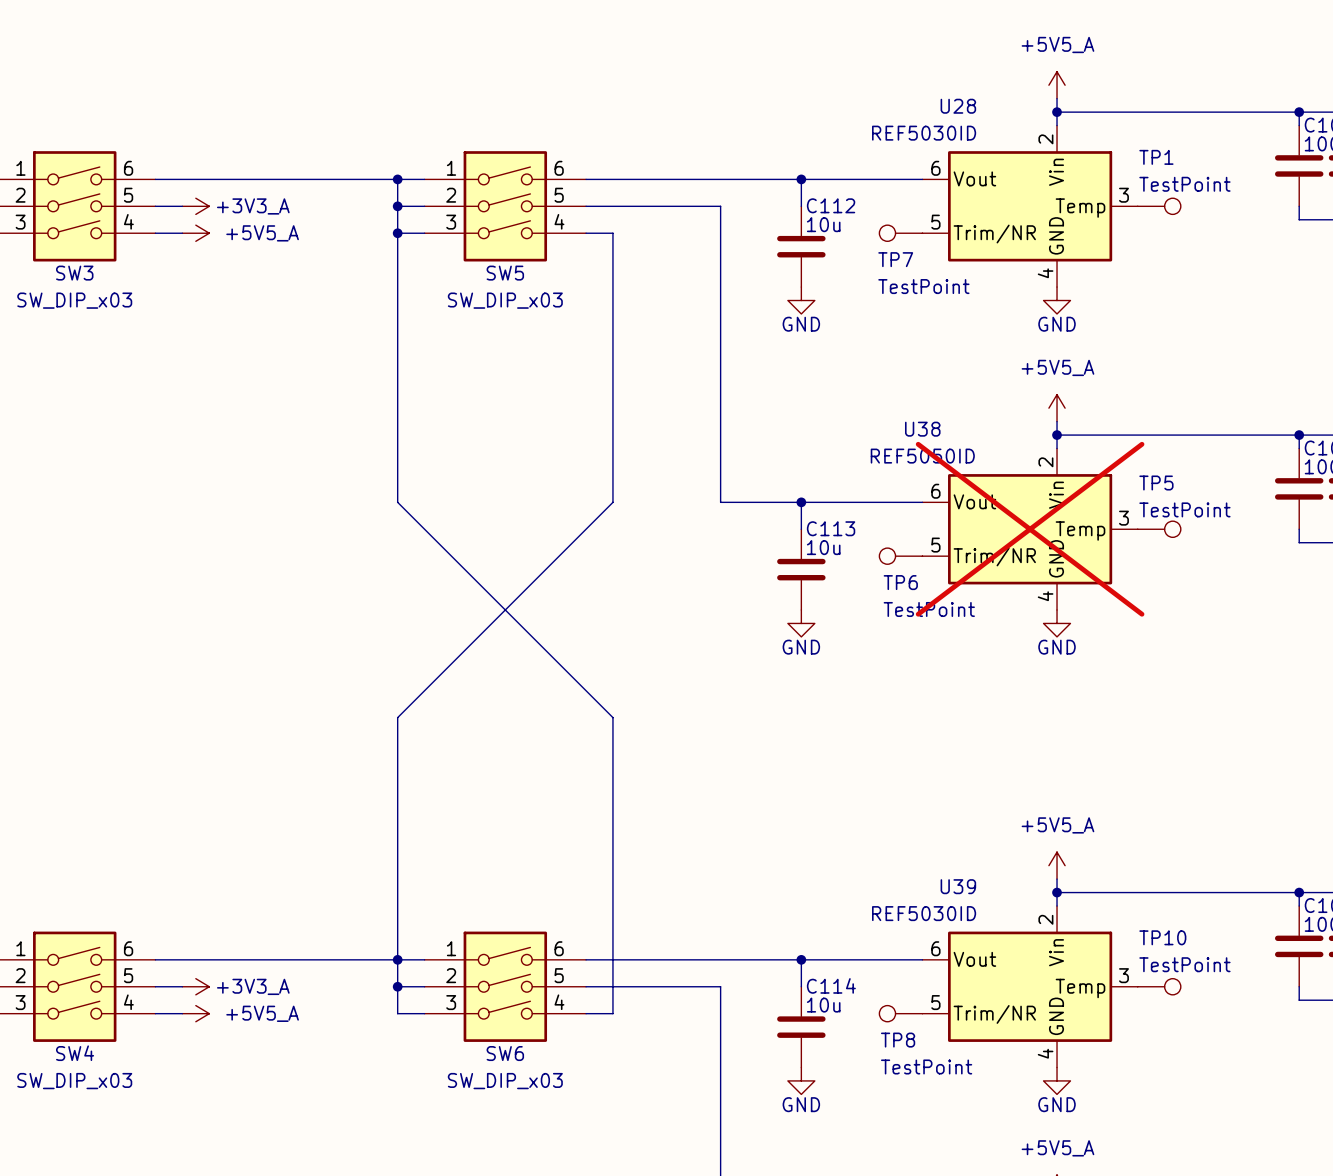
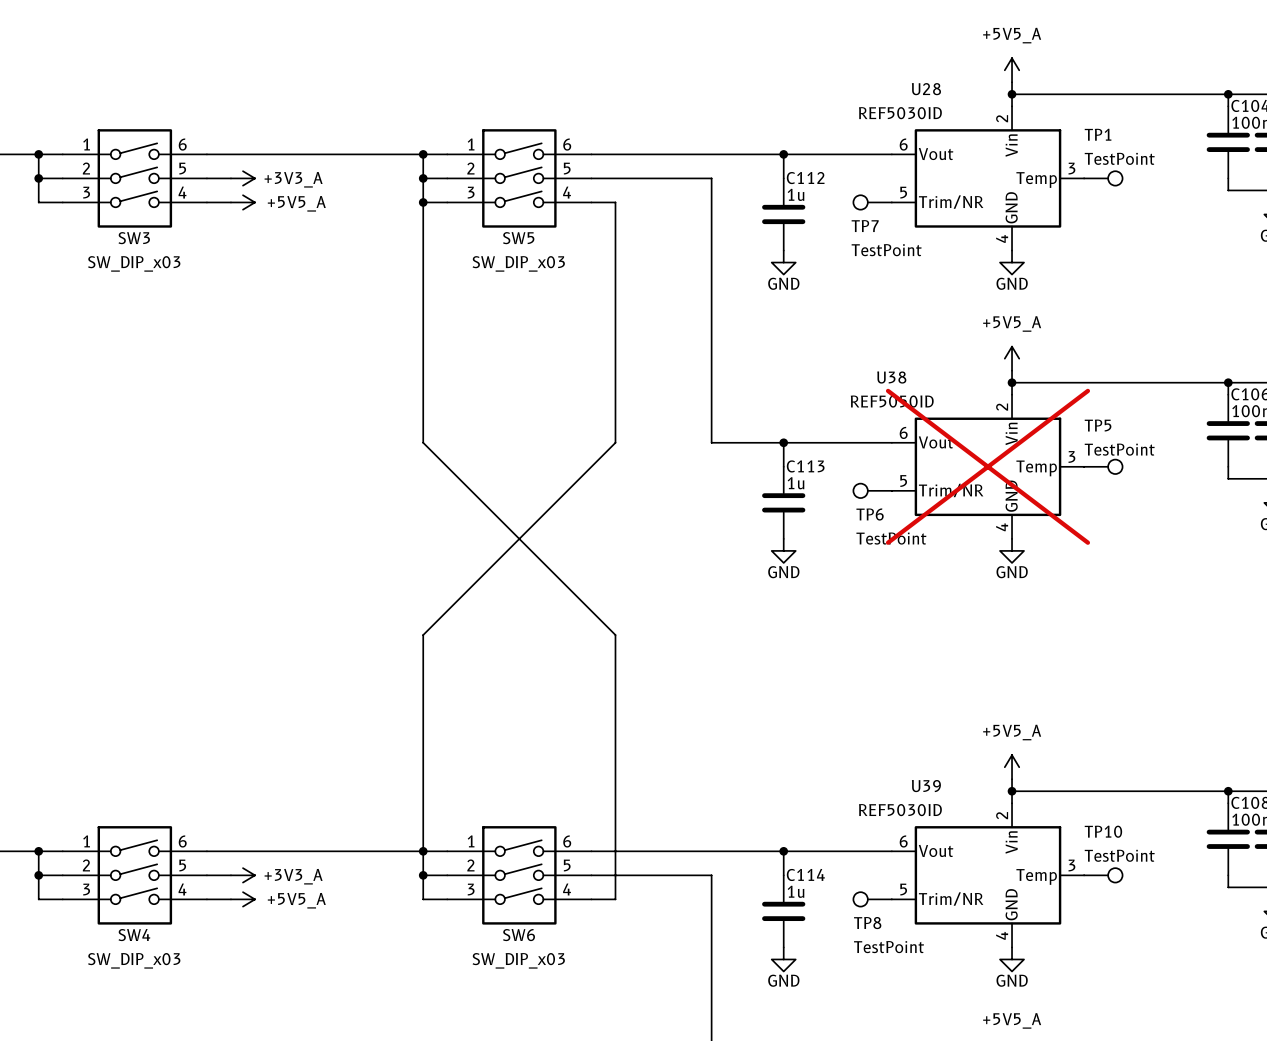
C112 value: 10u (823, 224) -> 1u (795, 194)
C113 value: 10u (823, 547) -> 1u (795, 483)
C114 value: 10u (823, 1005) -> 1u (795, 891)

